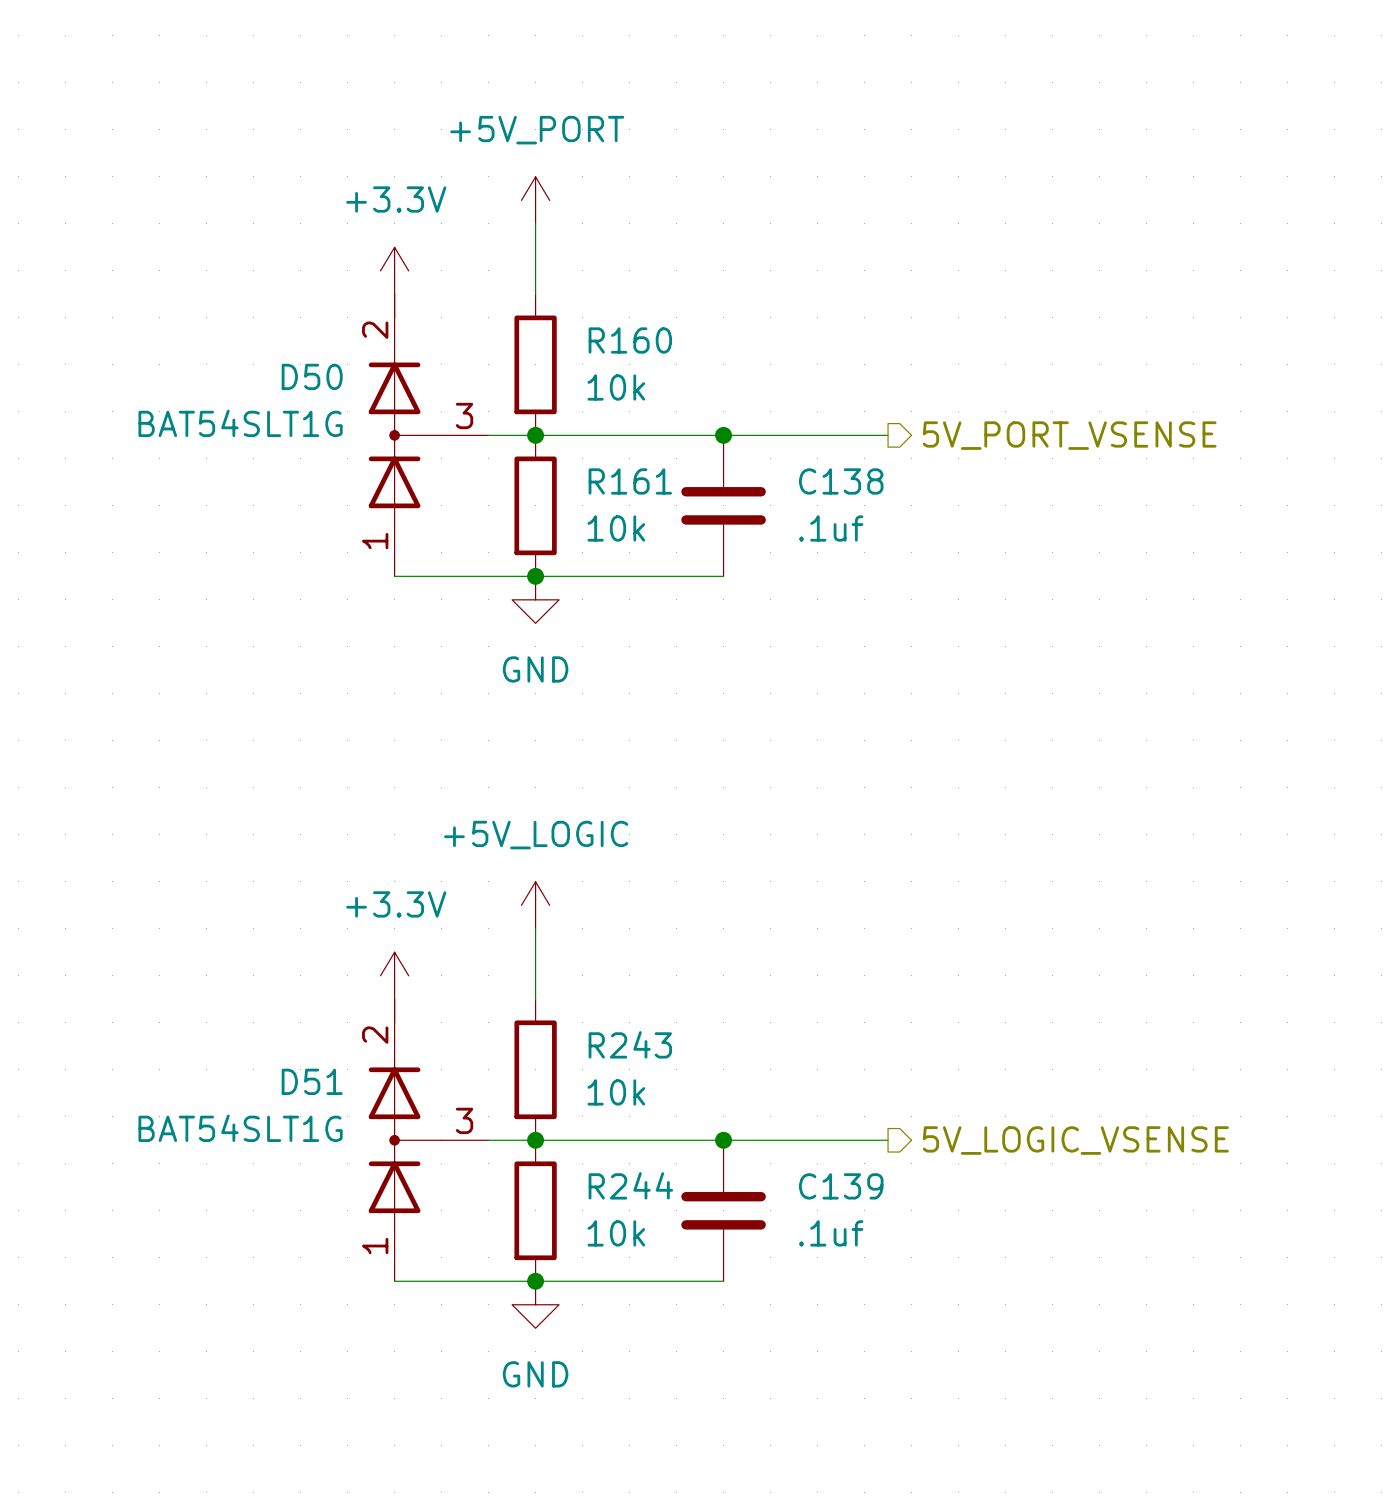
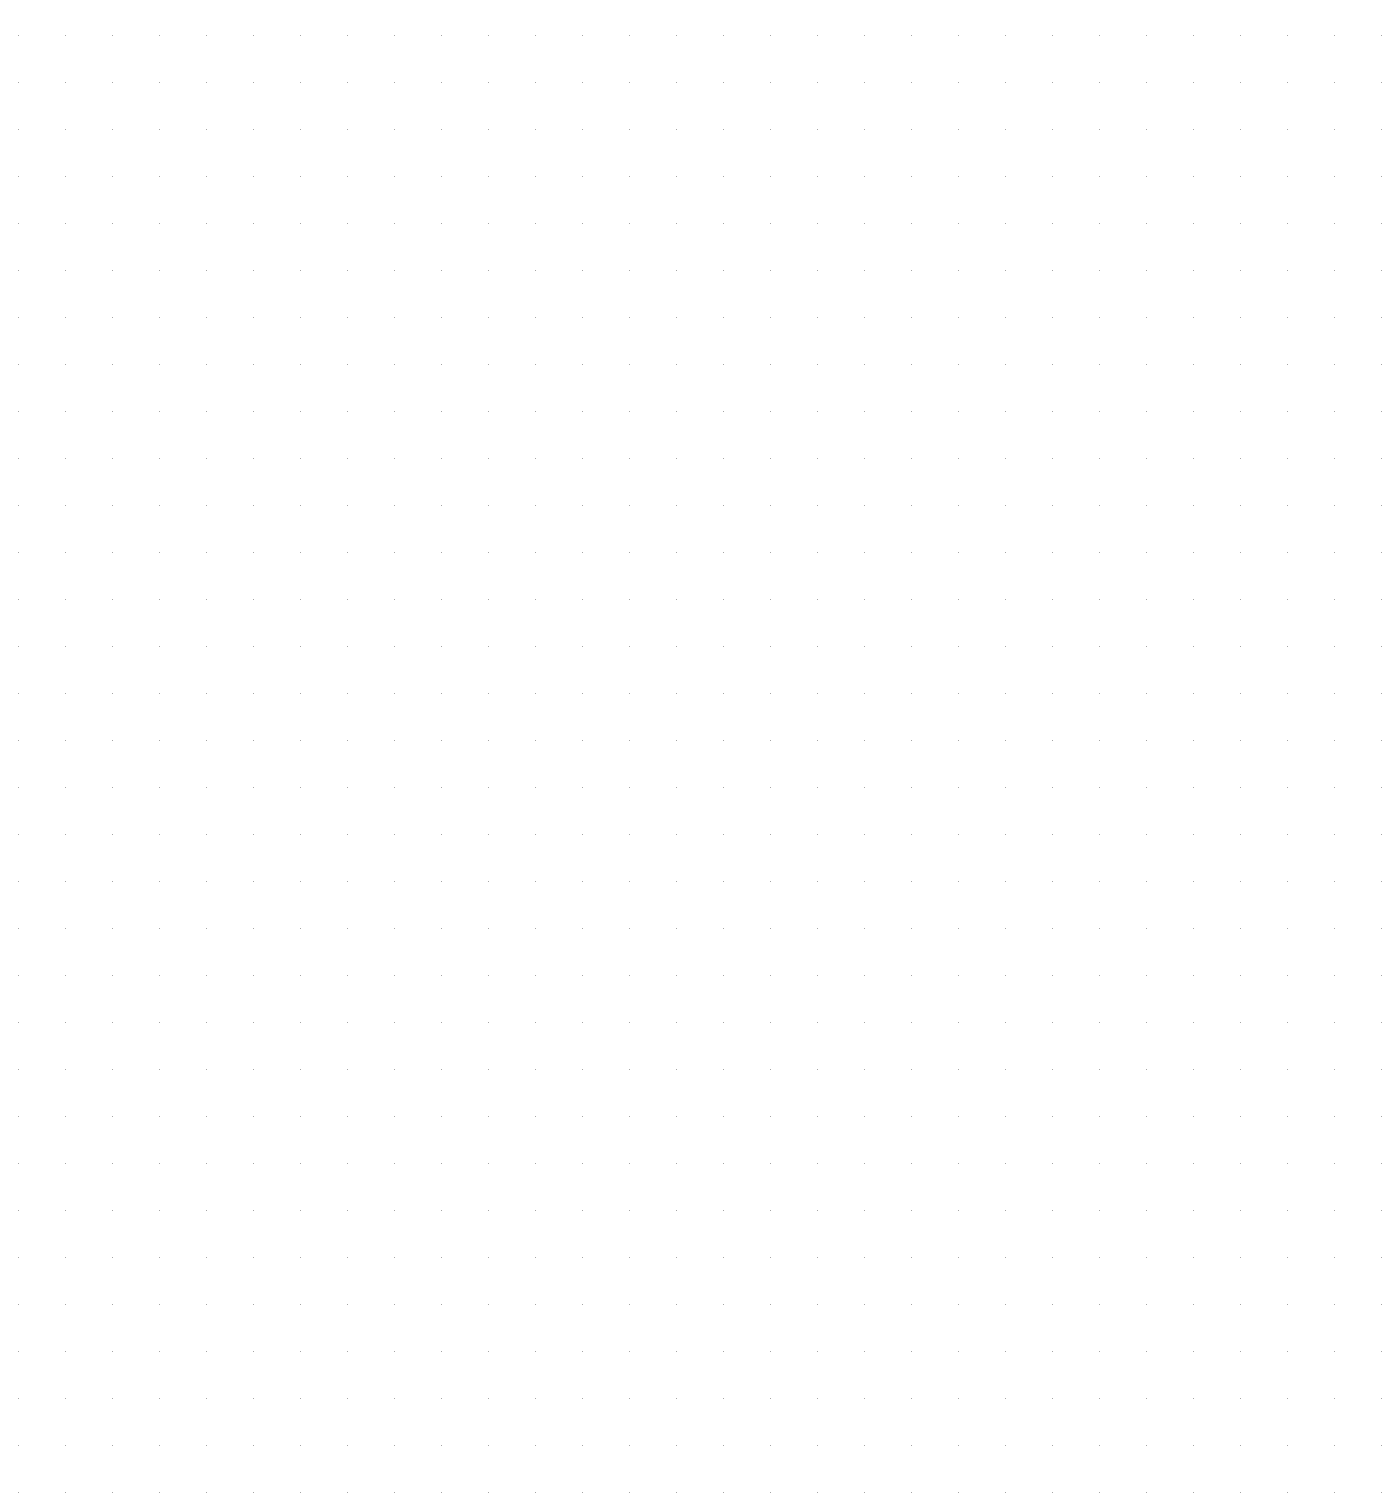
power symbol: +5V_PORT (535, 200) -> none
wire: (535, 223) (535, 294) -> none
power symbol: +3.3V (394, 270) -> none
R160: 10k (535, 364) -> none
D50: BAT54SLT1G (428, 435) -> none
wire: (488, 435) (888, 435) -> none
junction: (535, 435) -> none
junction: (723, 435) -> none
hierarchical label: 5V_PORT_VSENSE (1069, 435) -> none
R161: 10k (535, 505) -> none
C138: .1uf (723, 505) -> none
wire: (394, 576) (723, 576) -> none
junction: (535, 576) -> none
power symbol: GND (535, 599) -> none
power symbol: +5V_LOGIC (535, 905) -> none
wire: (535, 928) (535, 999) -> none
power symbol: +3.3V (394, 975) -> none
R243: 10k (535, 1069) -> none
D51: BAT54SLT1G (428, 1140) -> none
wire: (488, 1140) (888, 1140) -> none
junction: (535, 1140) -> none
junction: (723, 1140) -> none
hierarchical label: 5V_LOGIC_VSENSE (1075, 1140) -> none
R244: 10k (535, 1210) -> none
C139: .1uf (723, 1210) -> none
wire: (394, 1281) (723, 1281) -> none
junction: (535, 1281) -> none
power symbol: GND (535, 1304) -> none

